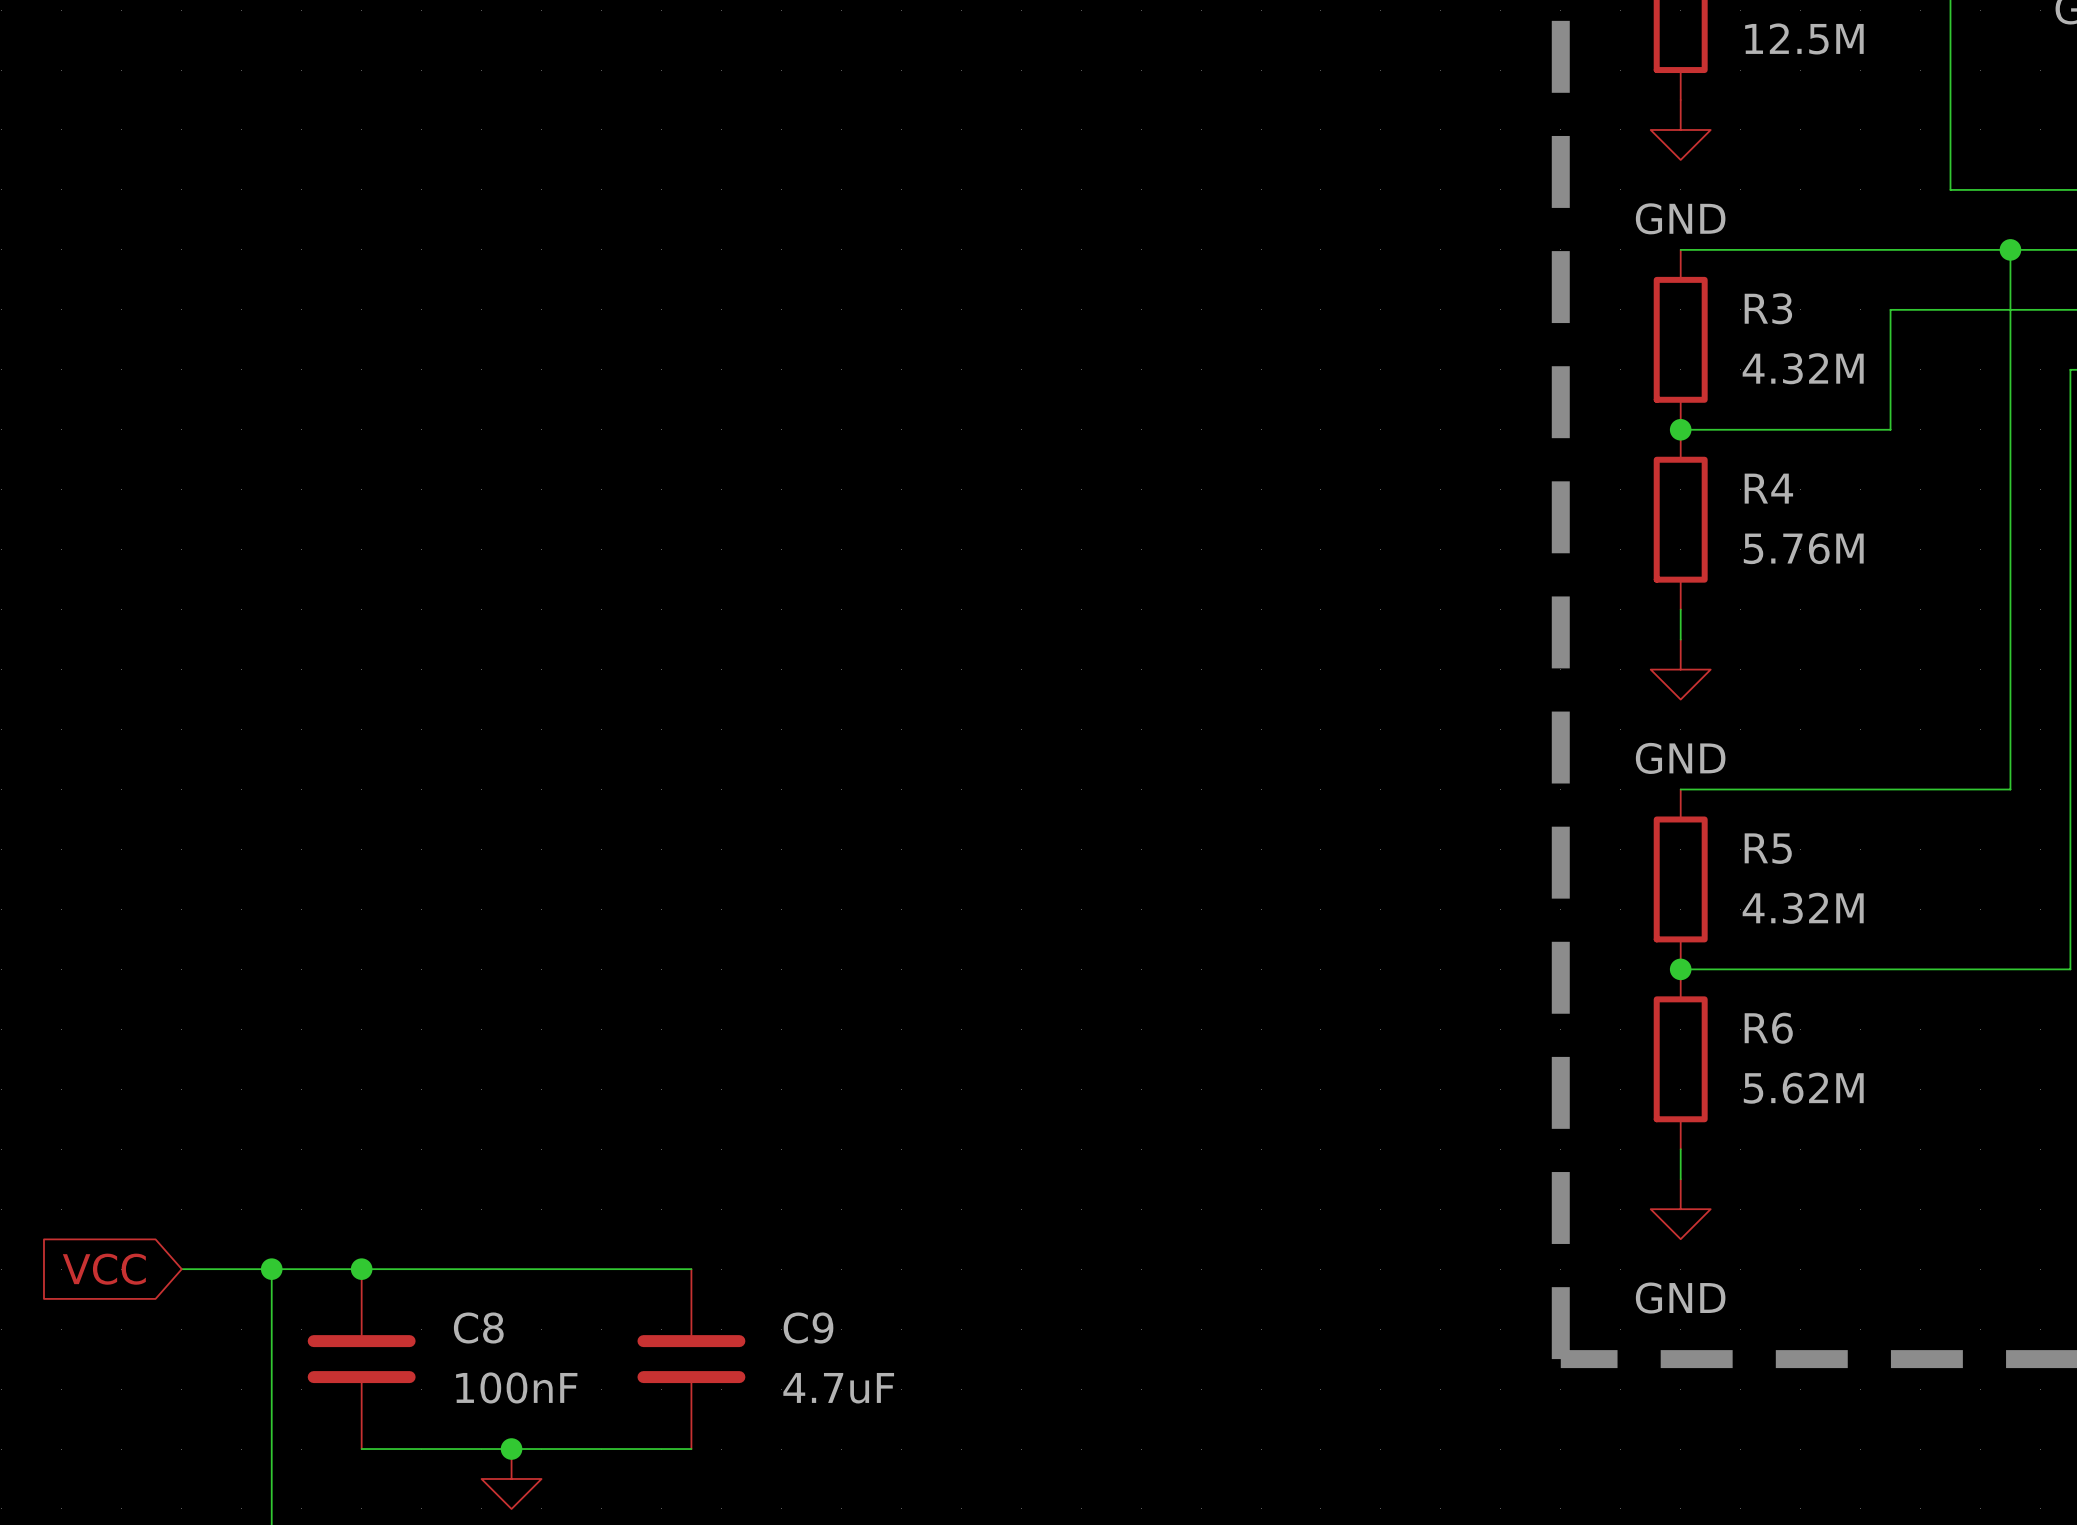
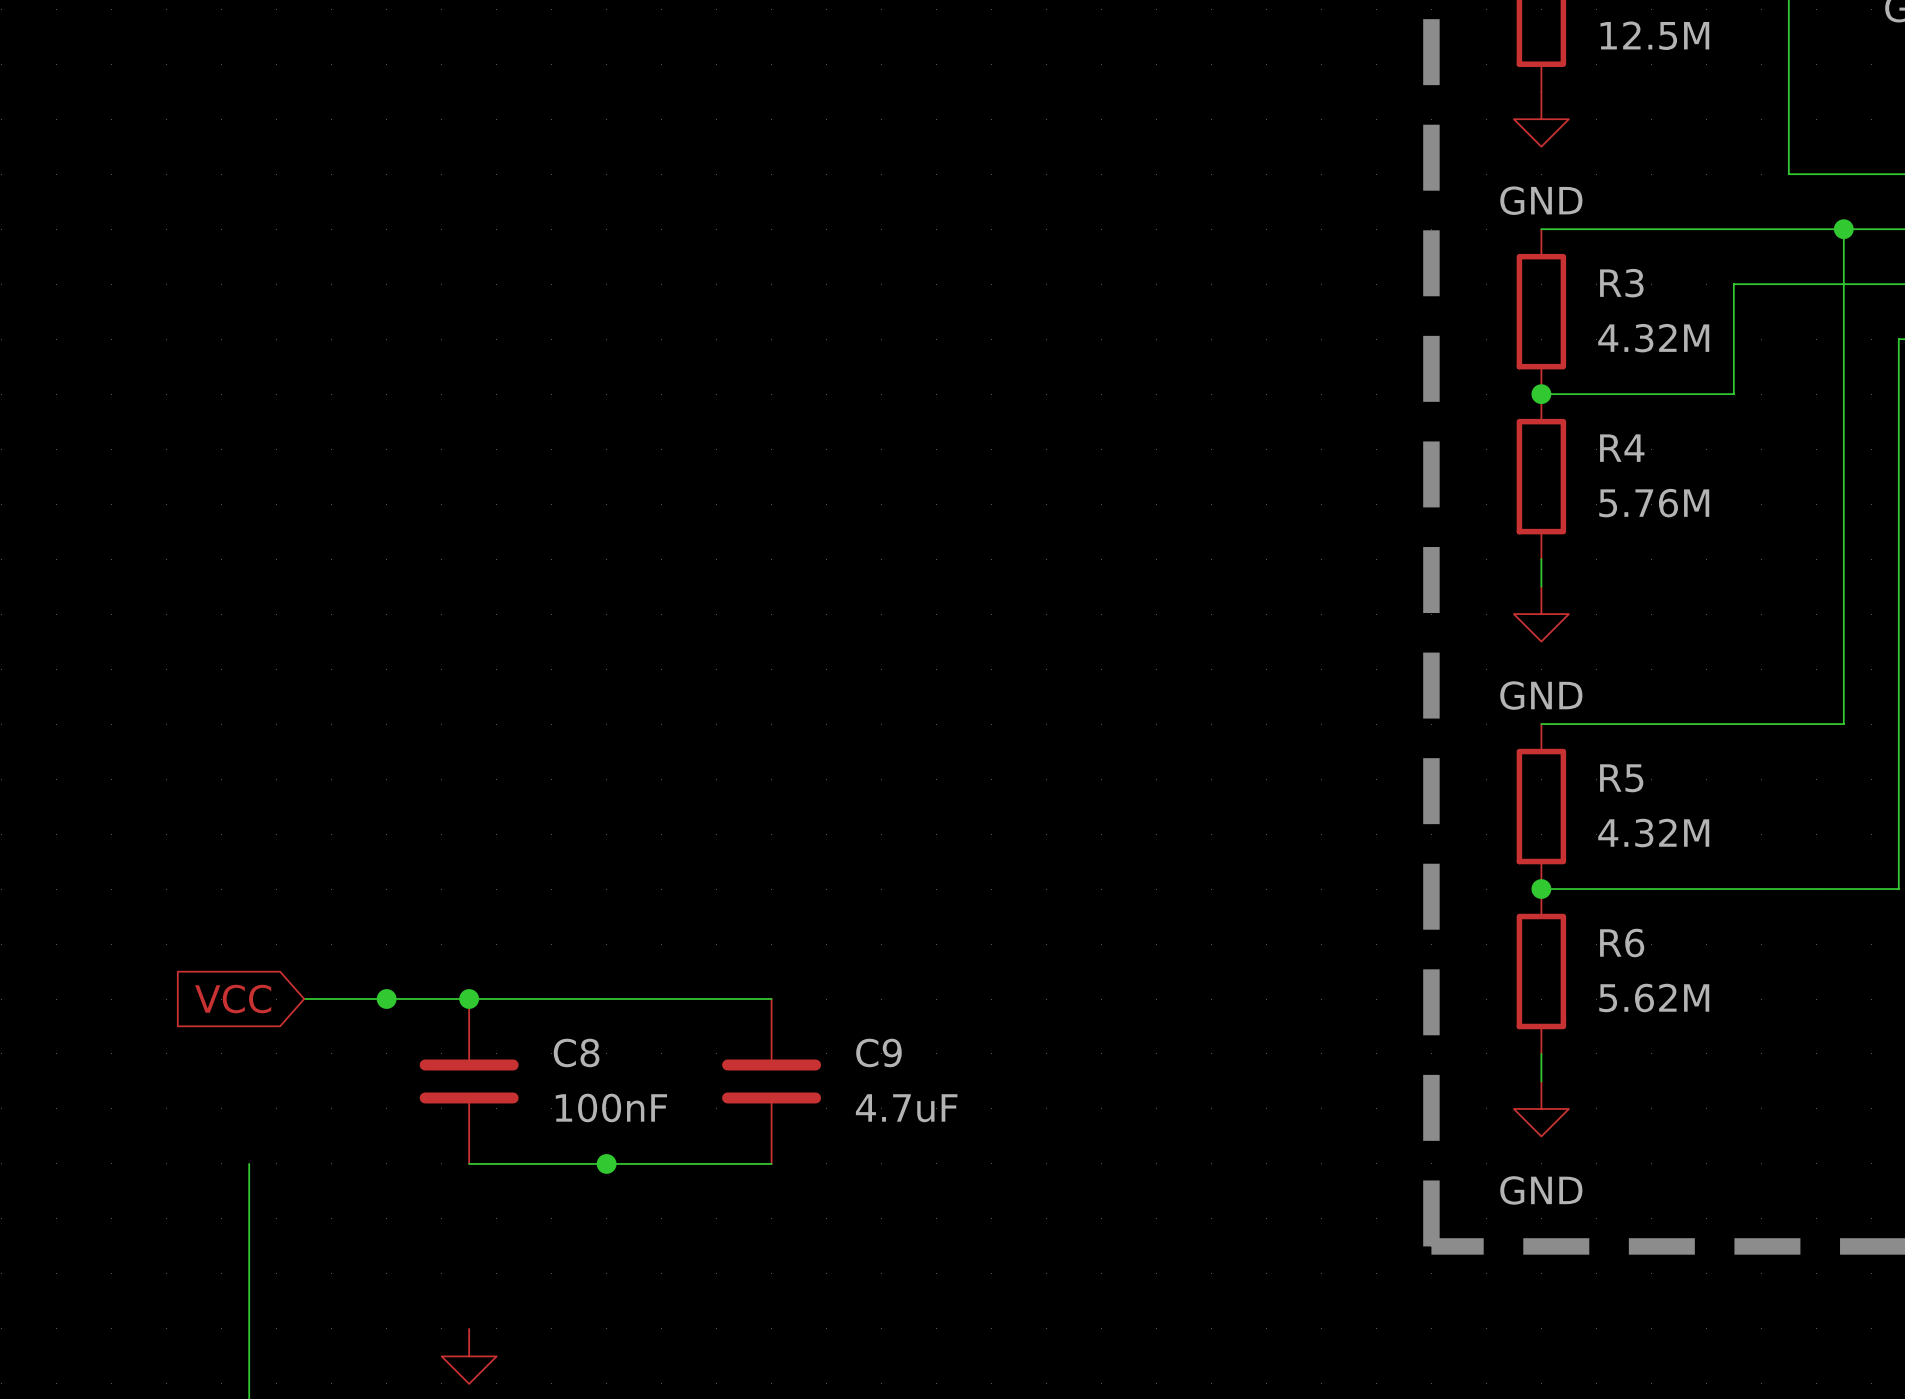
wire: none -> (304, 999) (771, 999)
junction: none -> (386, 999)
junction: none -> (469, 999)
global label position: VCC (104, 1269) -> VCC (233, 999)
wire: (181, 1269) (511, 1269) -> none
junction: (271, 1269) -> none
junction: (361, 1269) -> none
junction: none -> (606, 1163)
wire: none -> (634, 1163) (771, 1163)
C8 position: (361, 1359) -> (469, 1081)
C9 position: (691, 1359) -> (771, 1081)
wire: (361, 1449) (691, 1449) -> none
junction: (511, 1449) -> none

